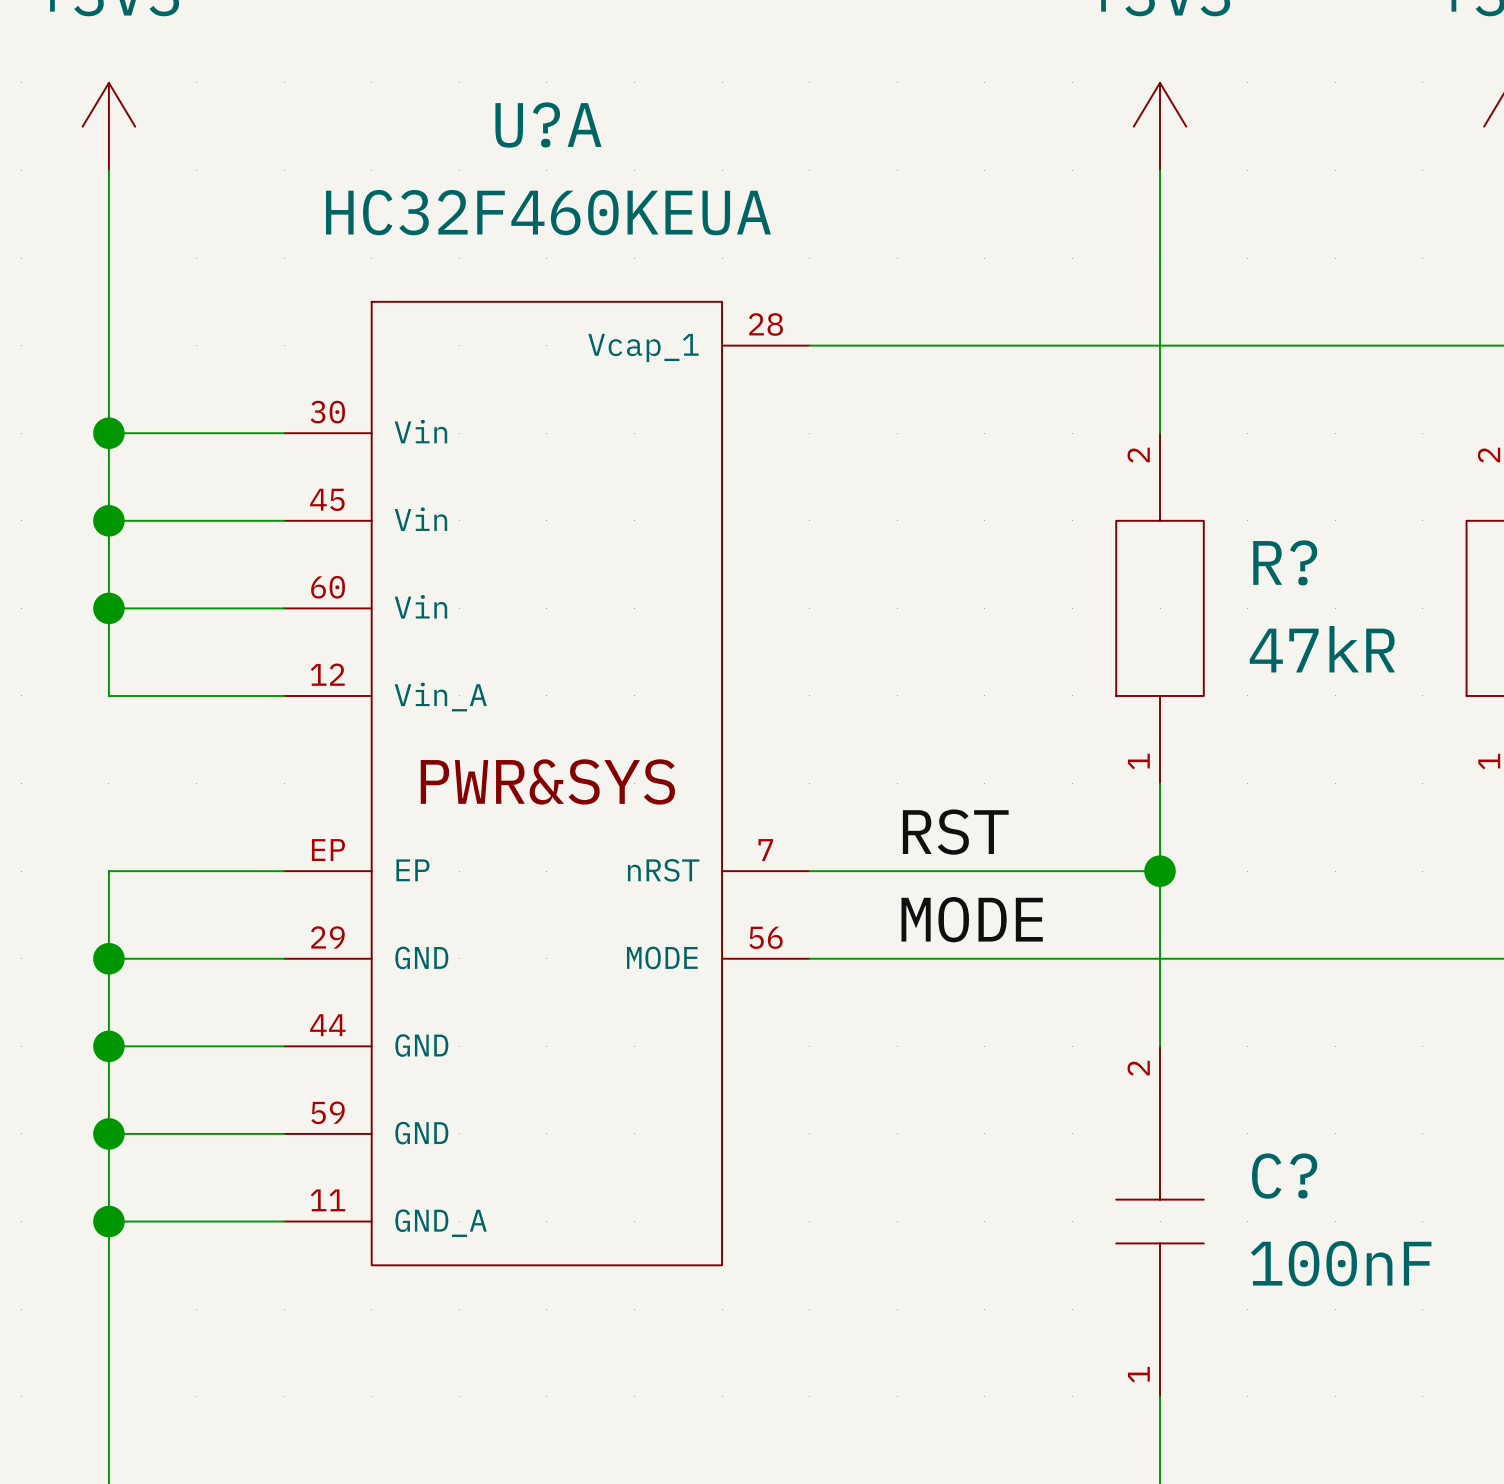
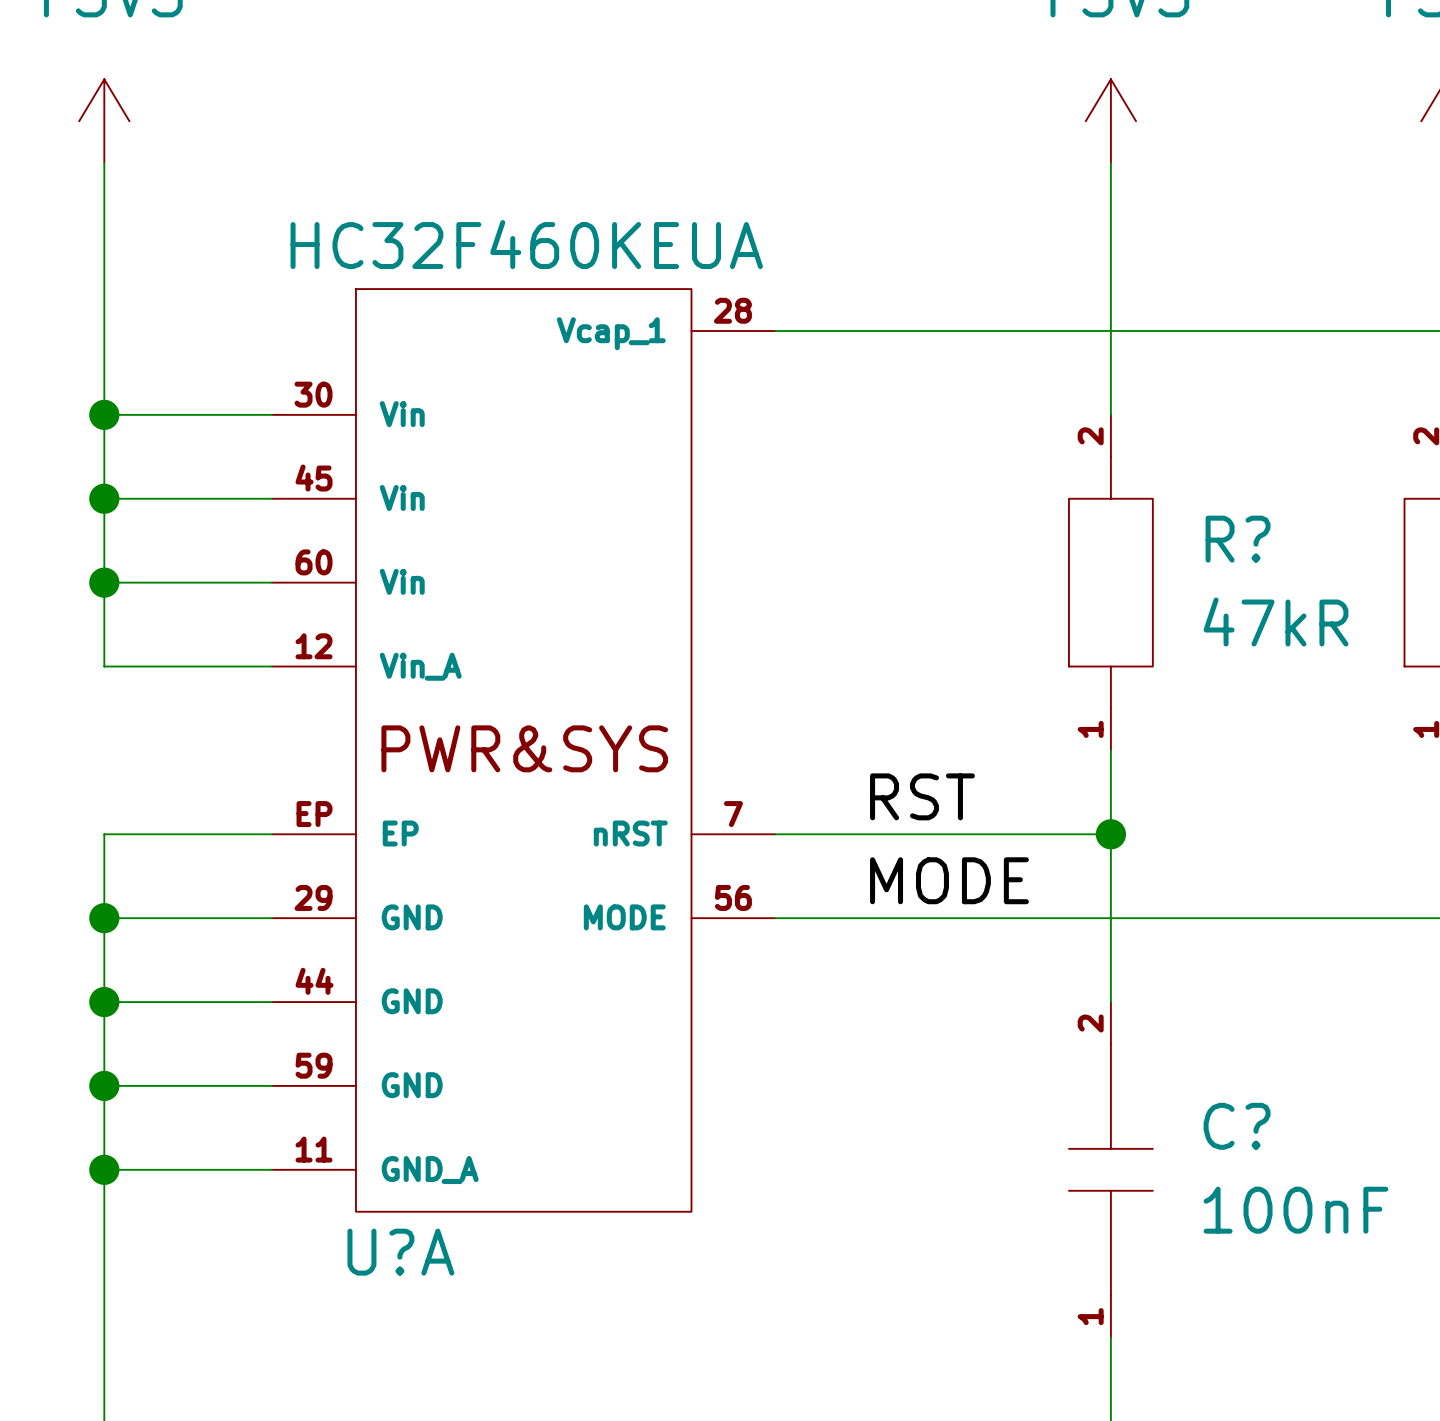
U?A name position: U?A (548, 125) -> U?A (400, 1252)
U?A value position: HC32F460KEUA (548, 212) -> HC32F460KEUA (526, 244)

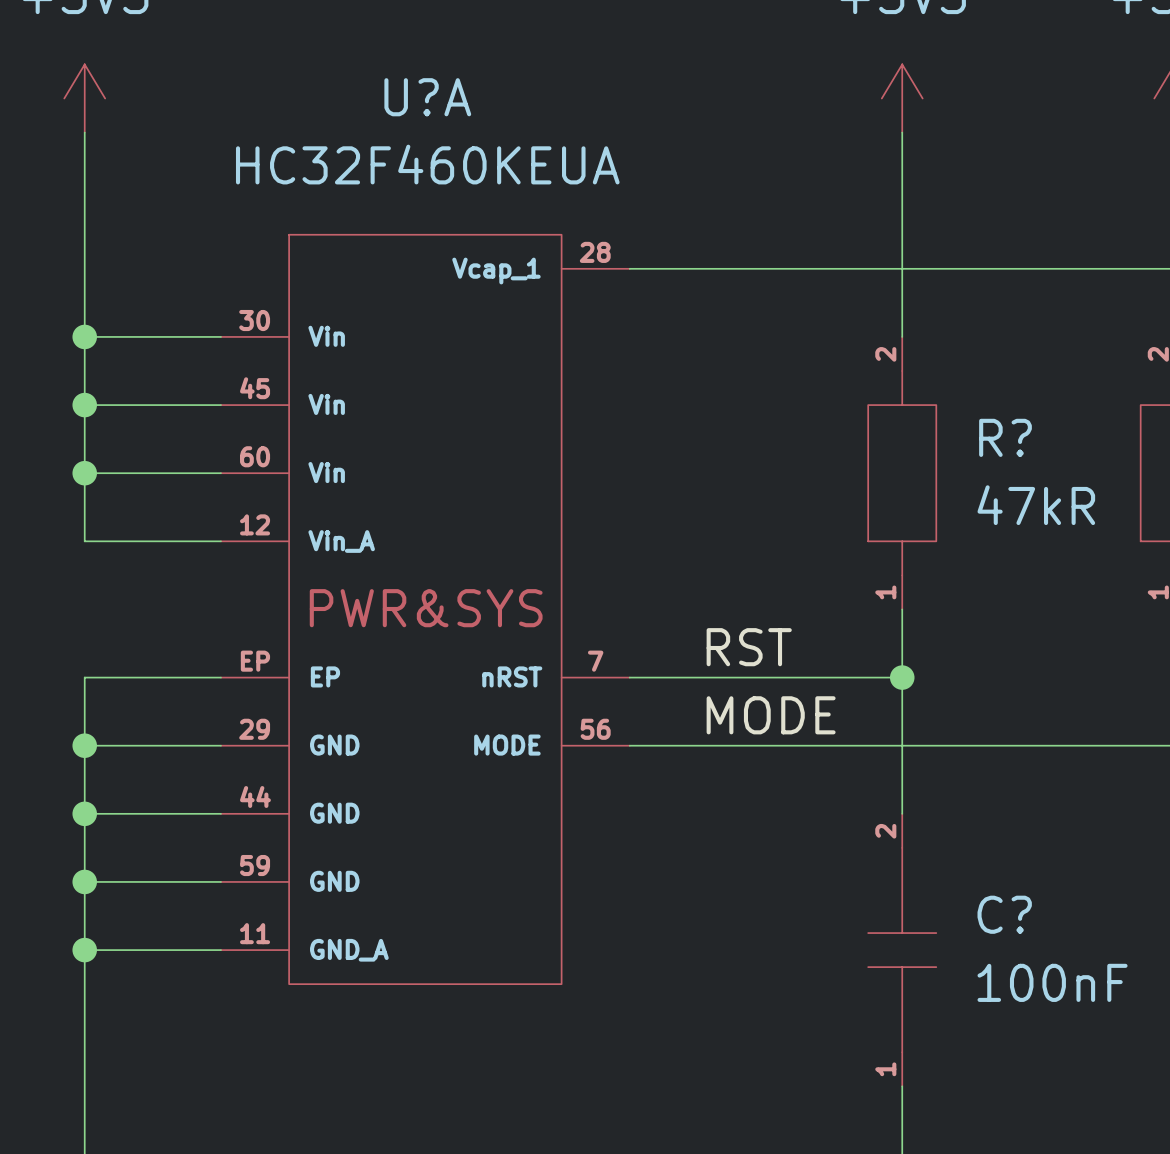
U?A value position: HC32F460KEUA (526, 244) -> HC32F460KEUA (427, 164)
U?A name position: U?A (400, 1252) -> U?A (427, 97)

